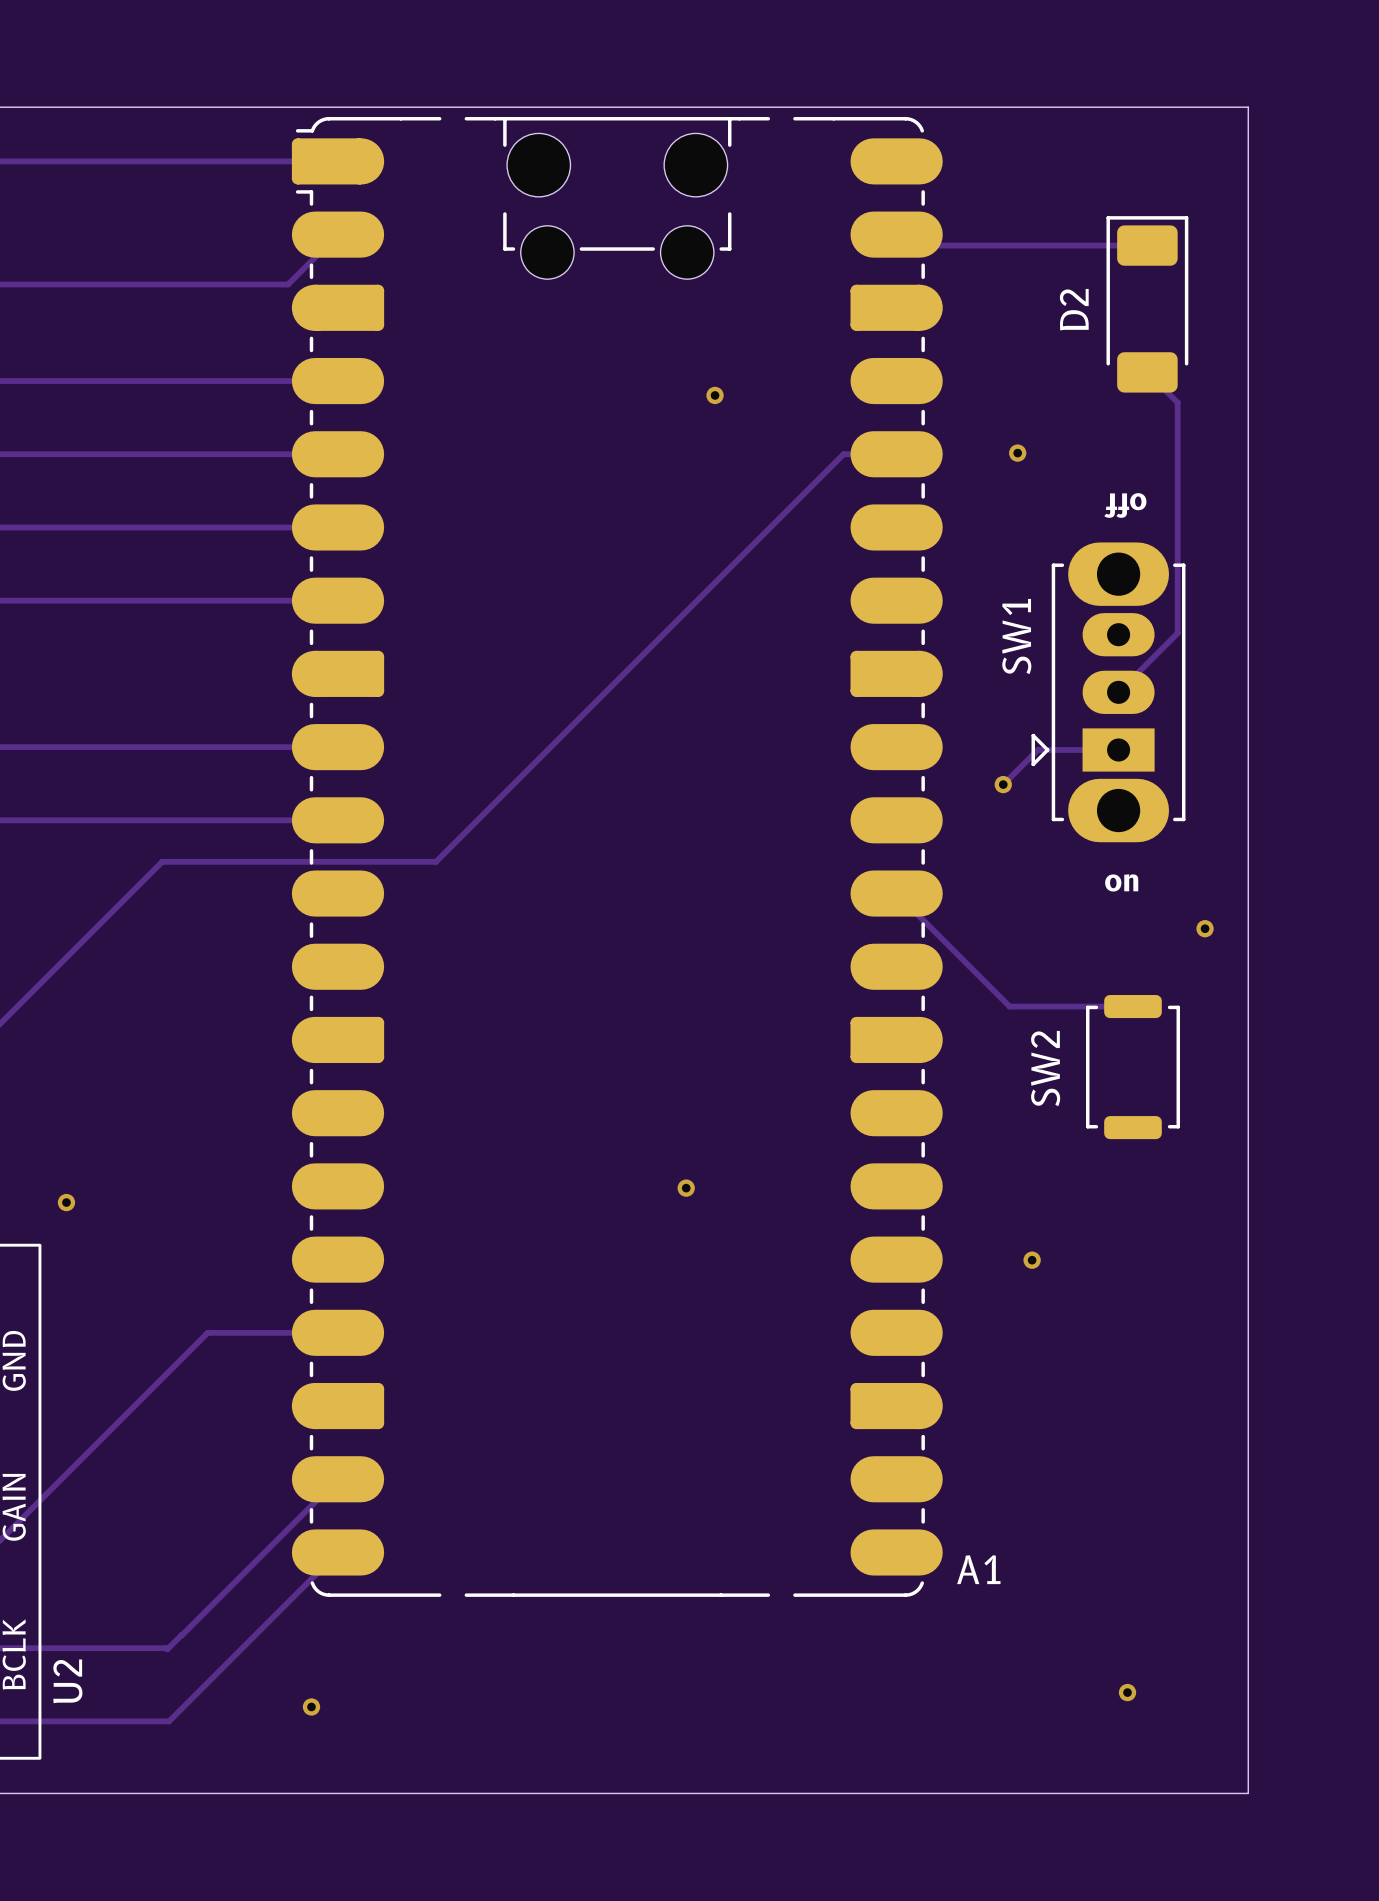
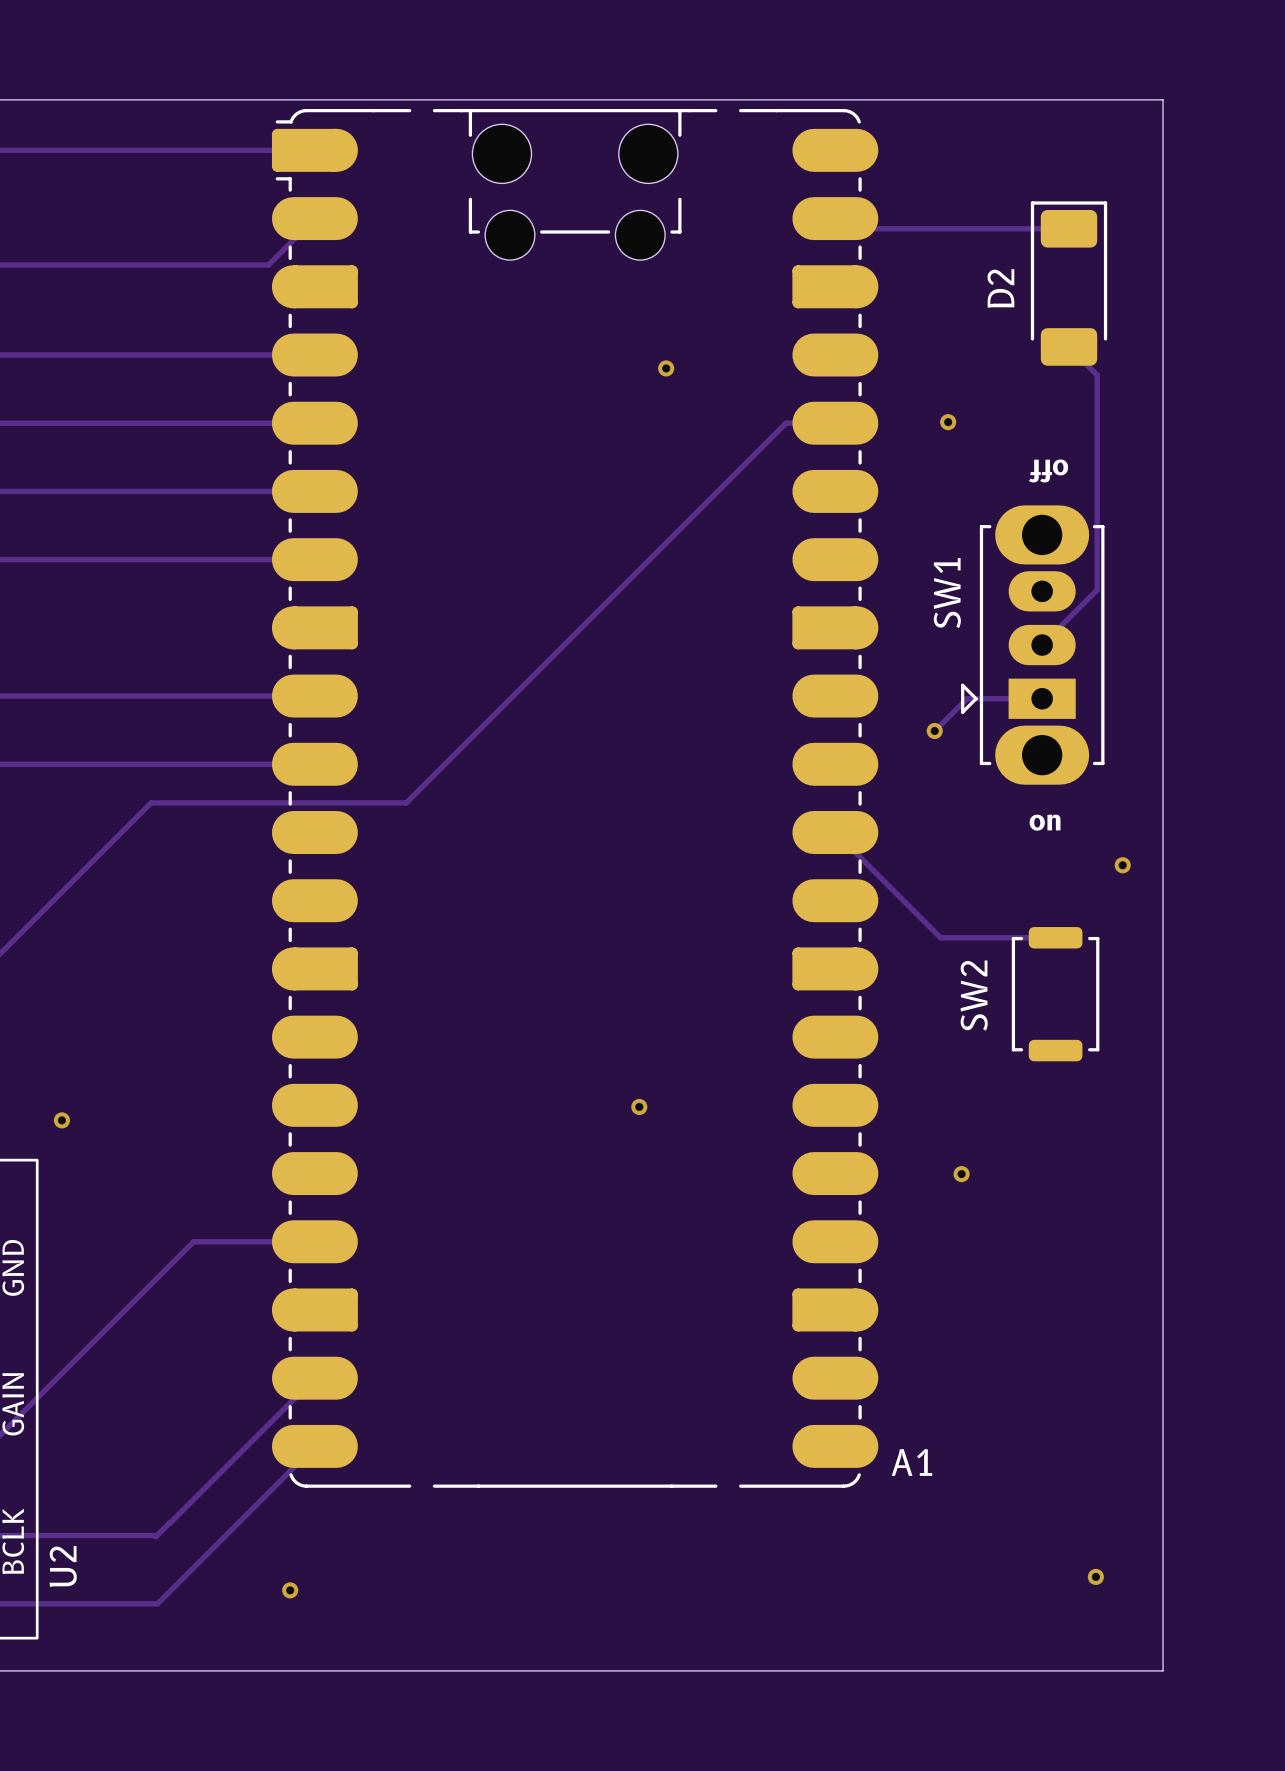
via position: (1127, 1692) -> (1095, 1576)

